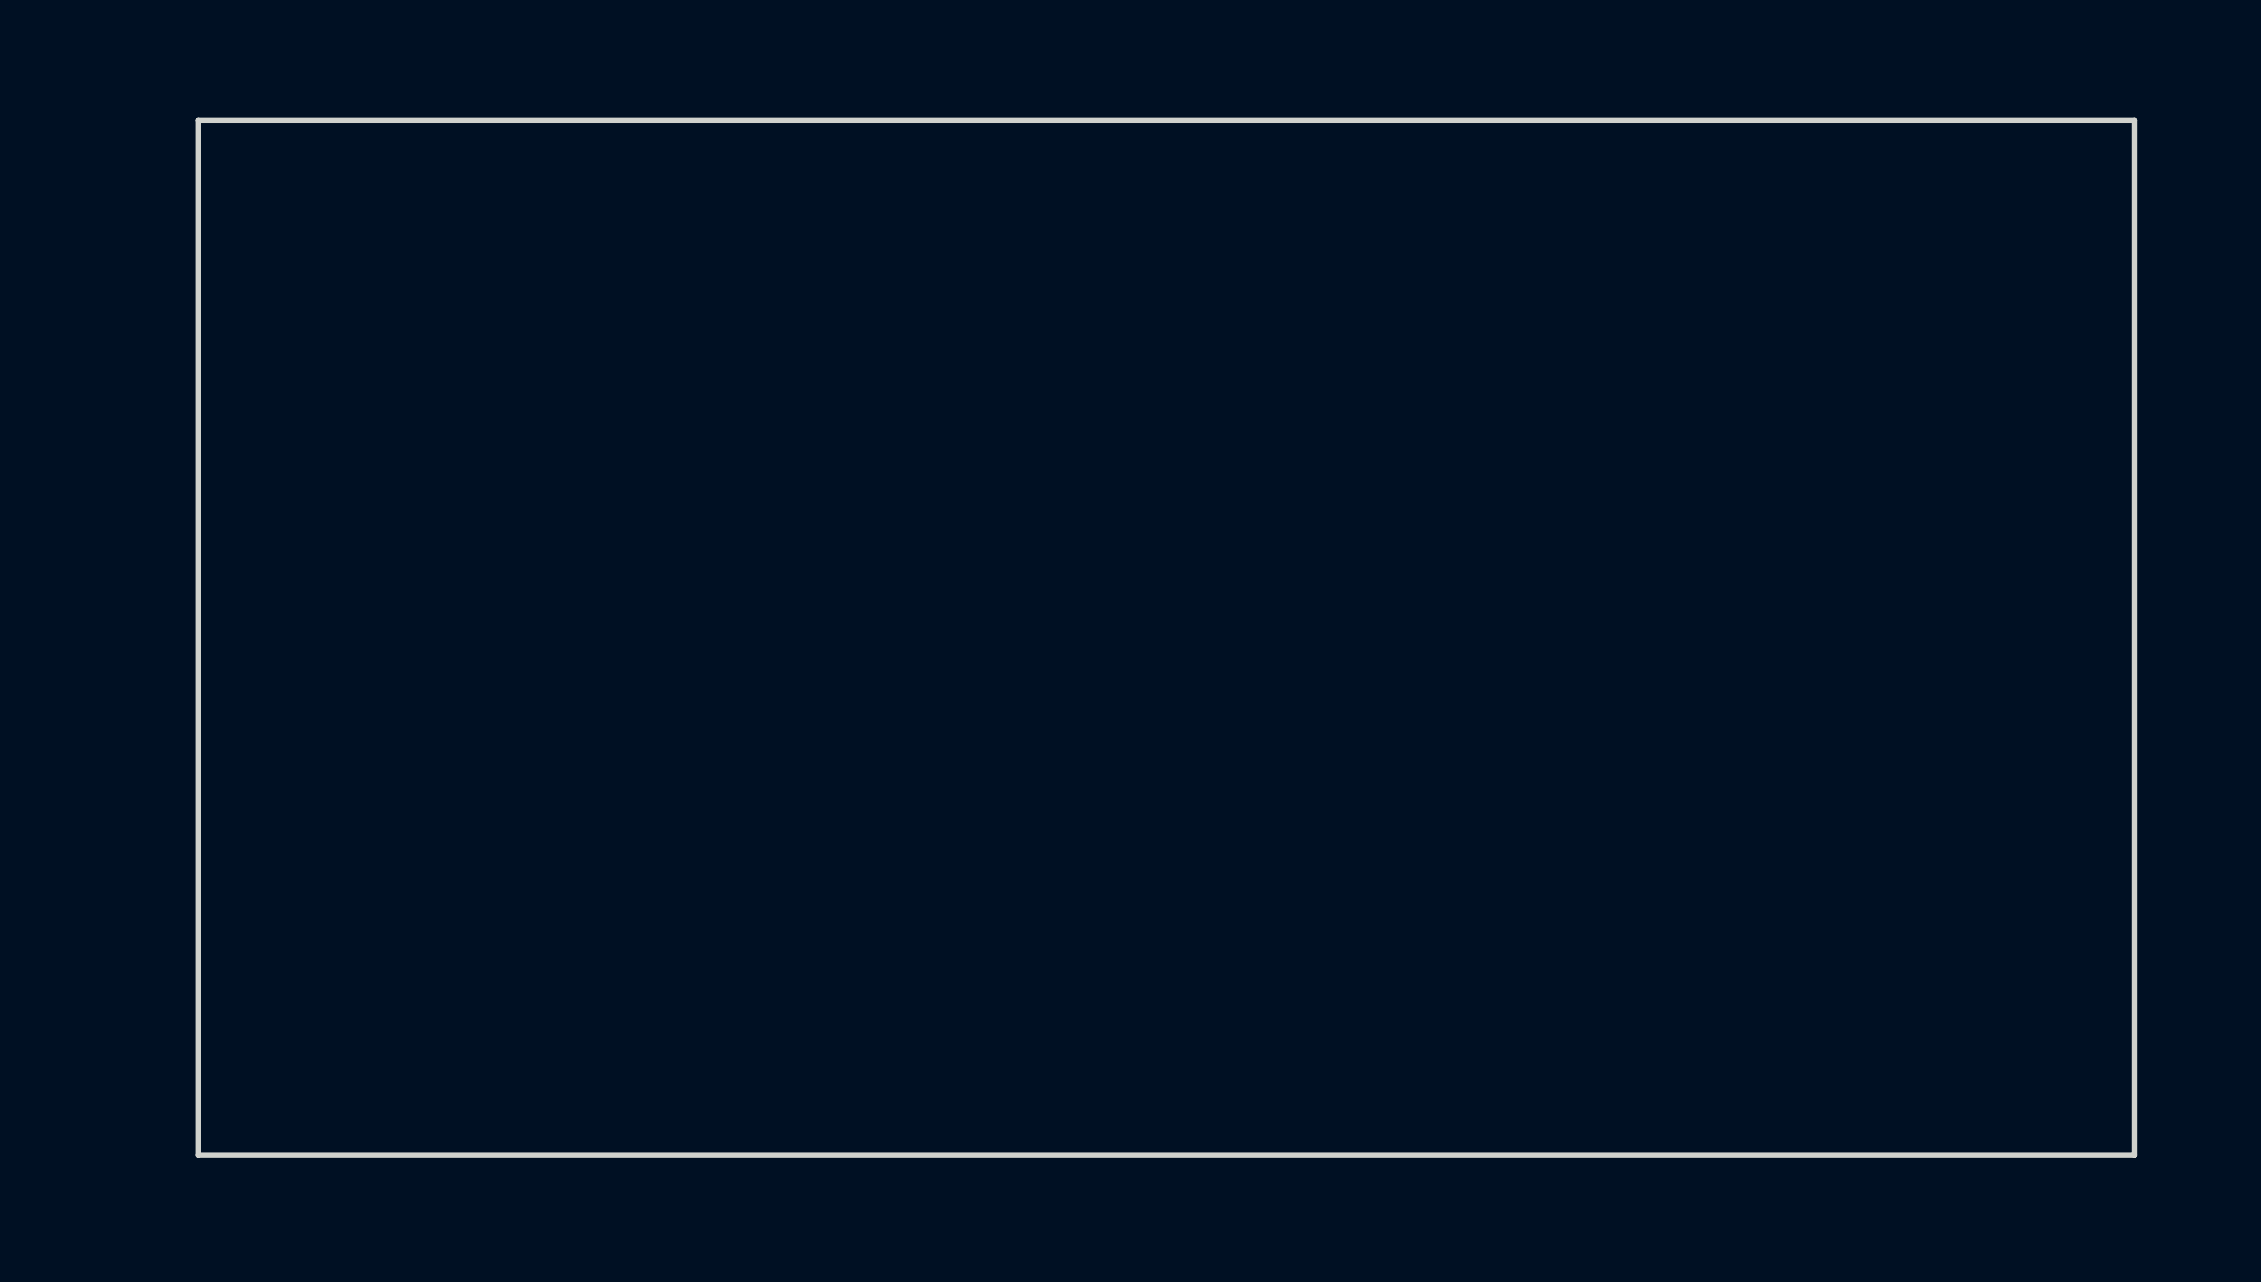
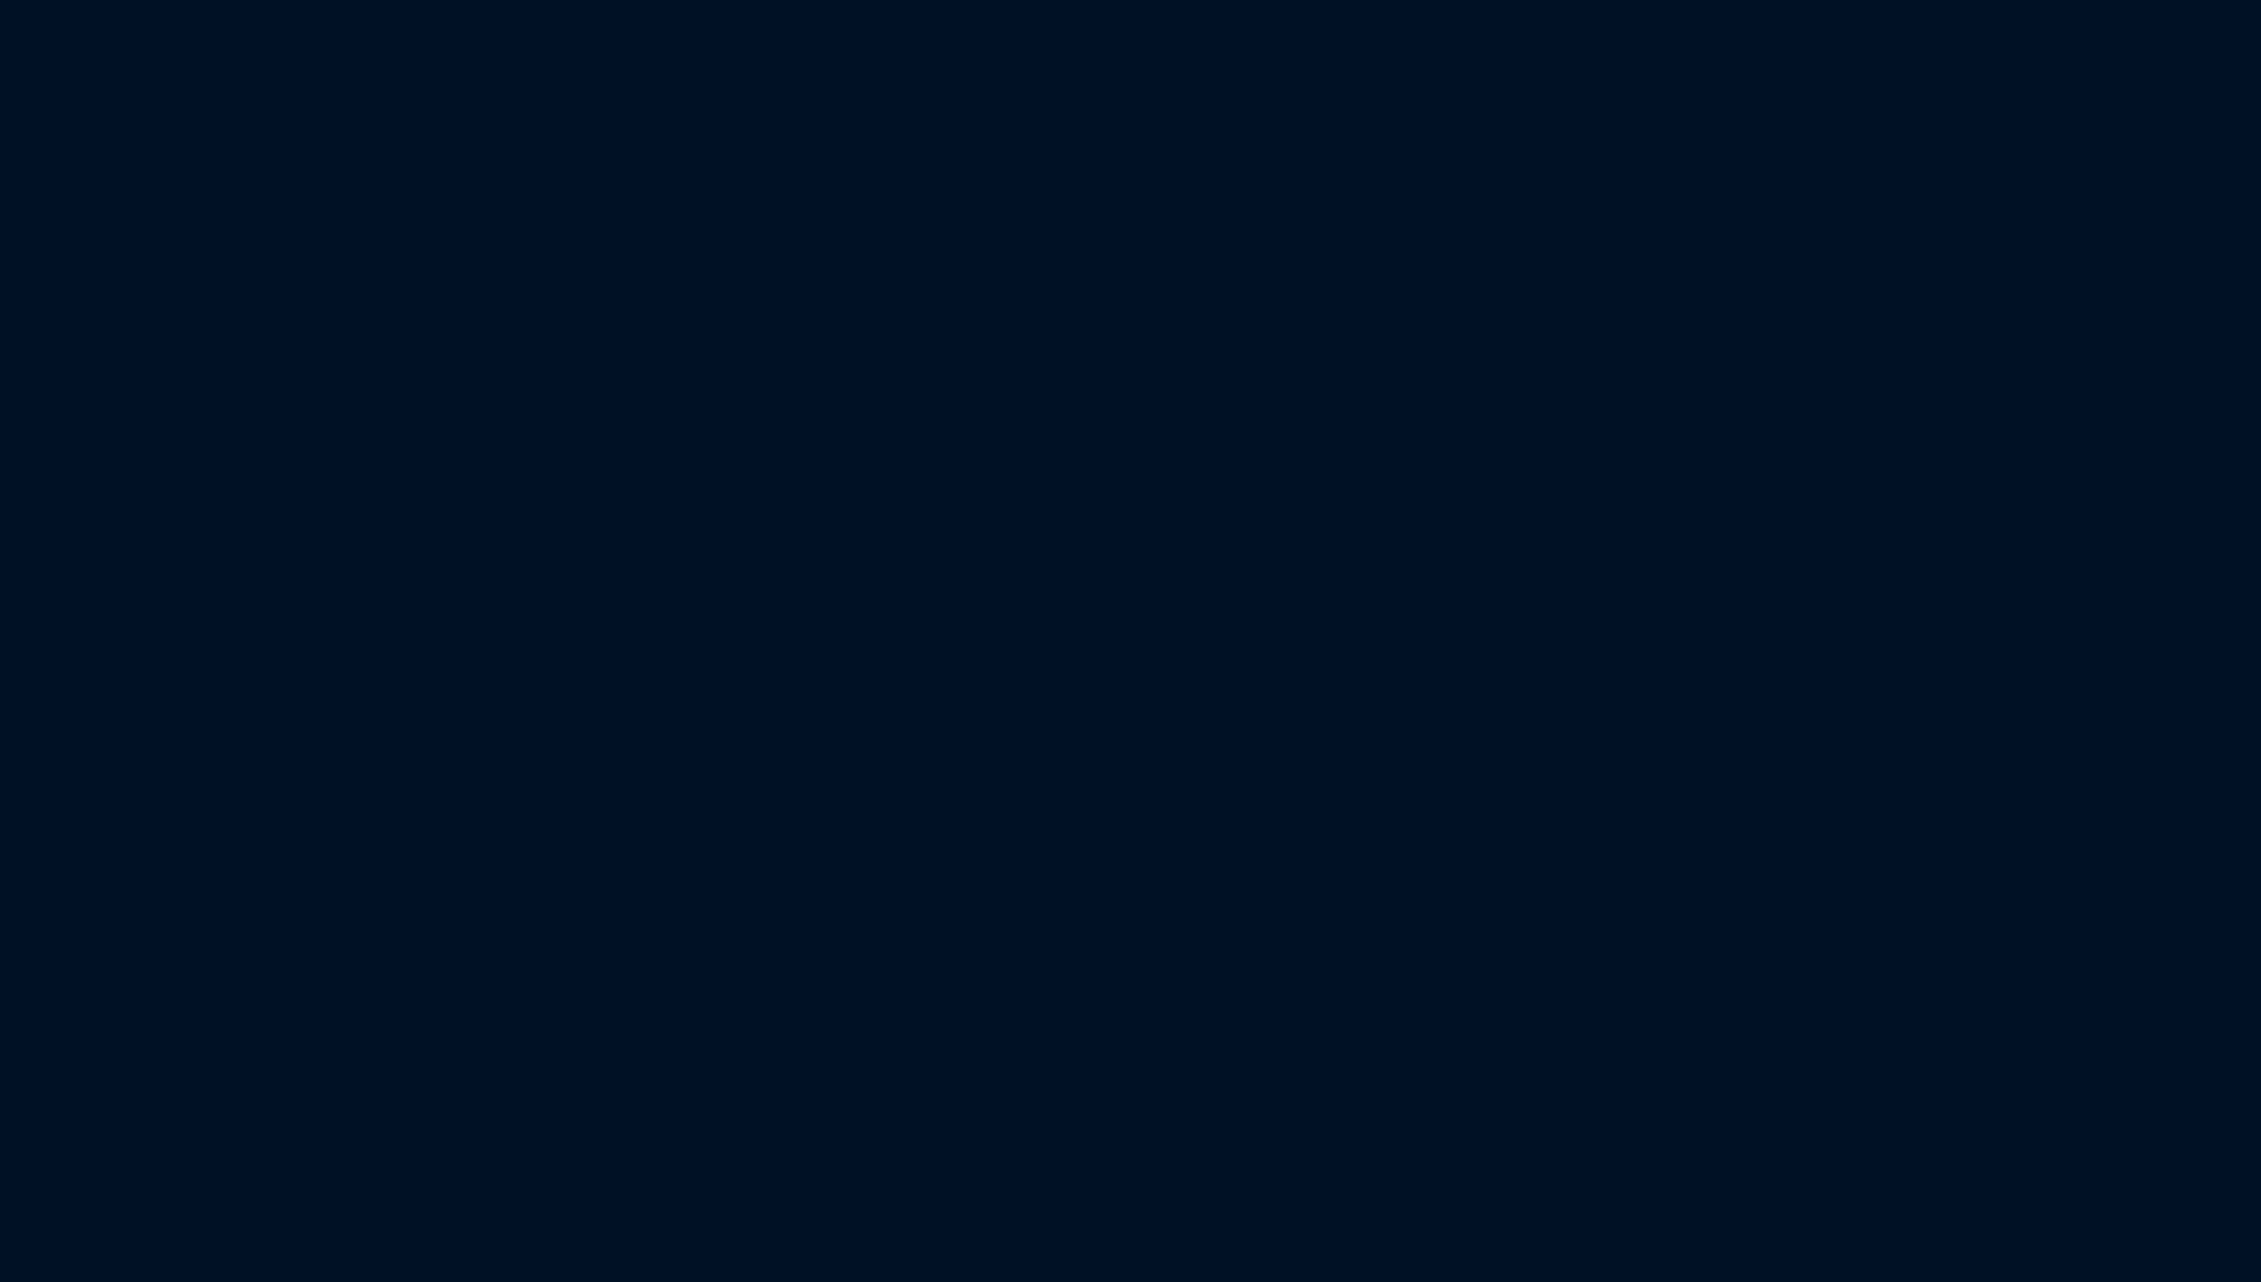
board edge: (198, 120) (198, 1155) (2134, 1155) (2134, 120) (198, 120) -> none

